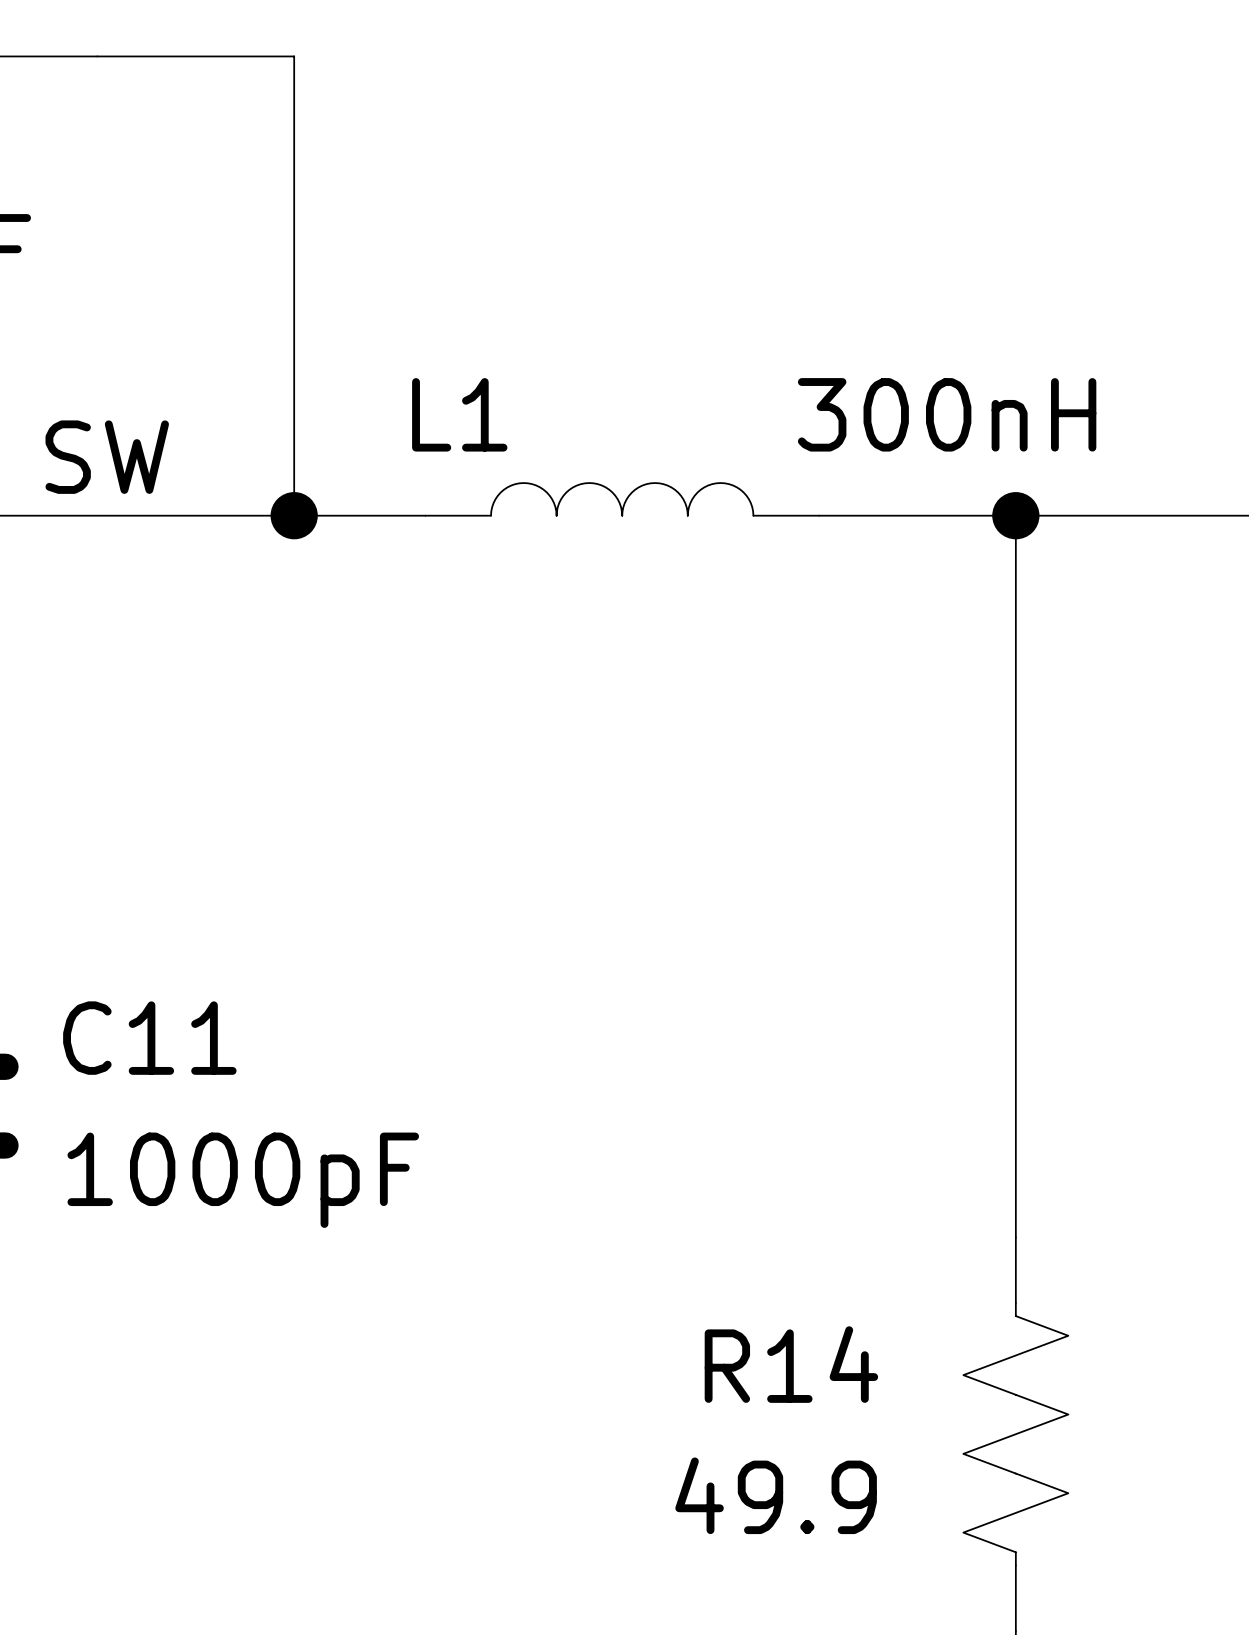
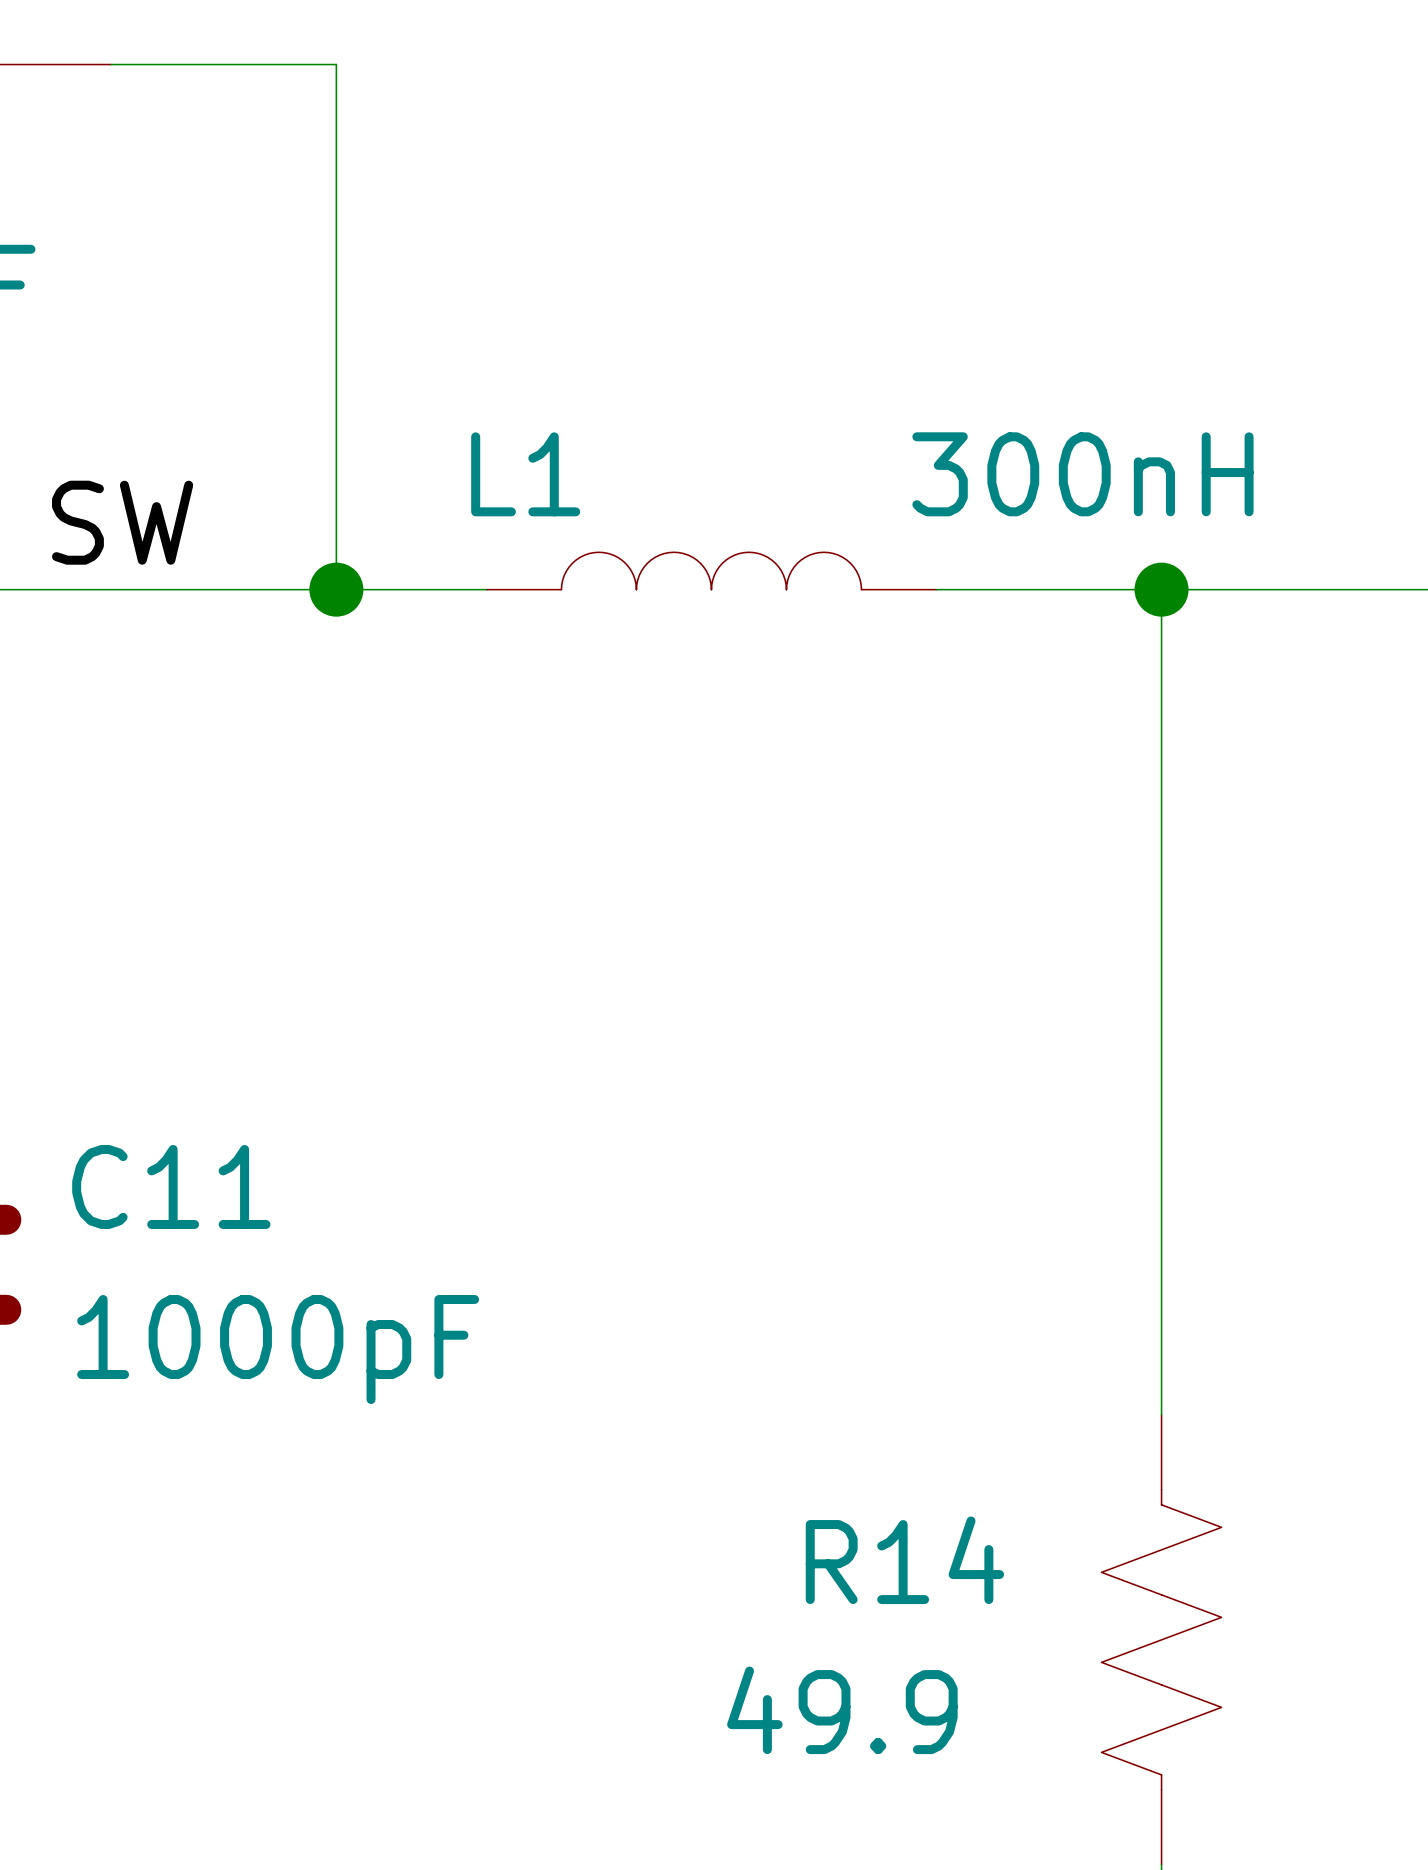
R14 value position: 49.9 (776, 1495) -> 49.9 (842, 1710)

